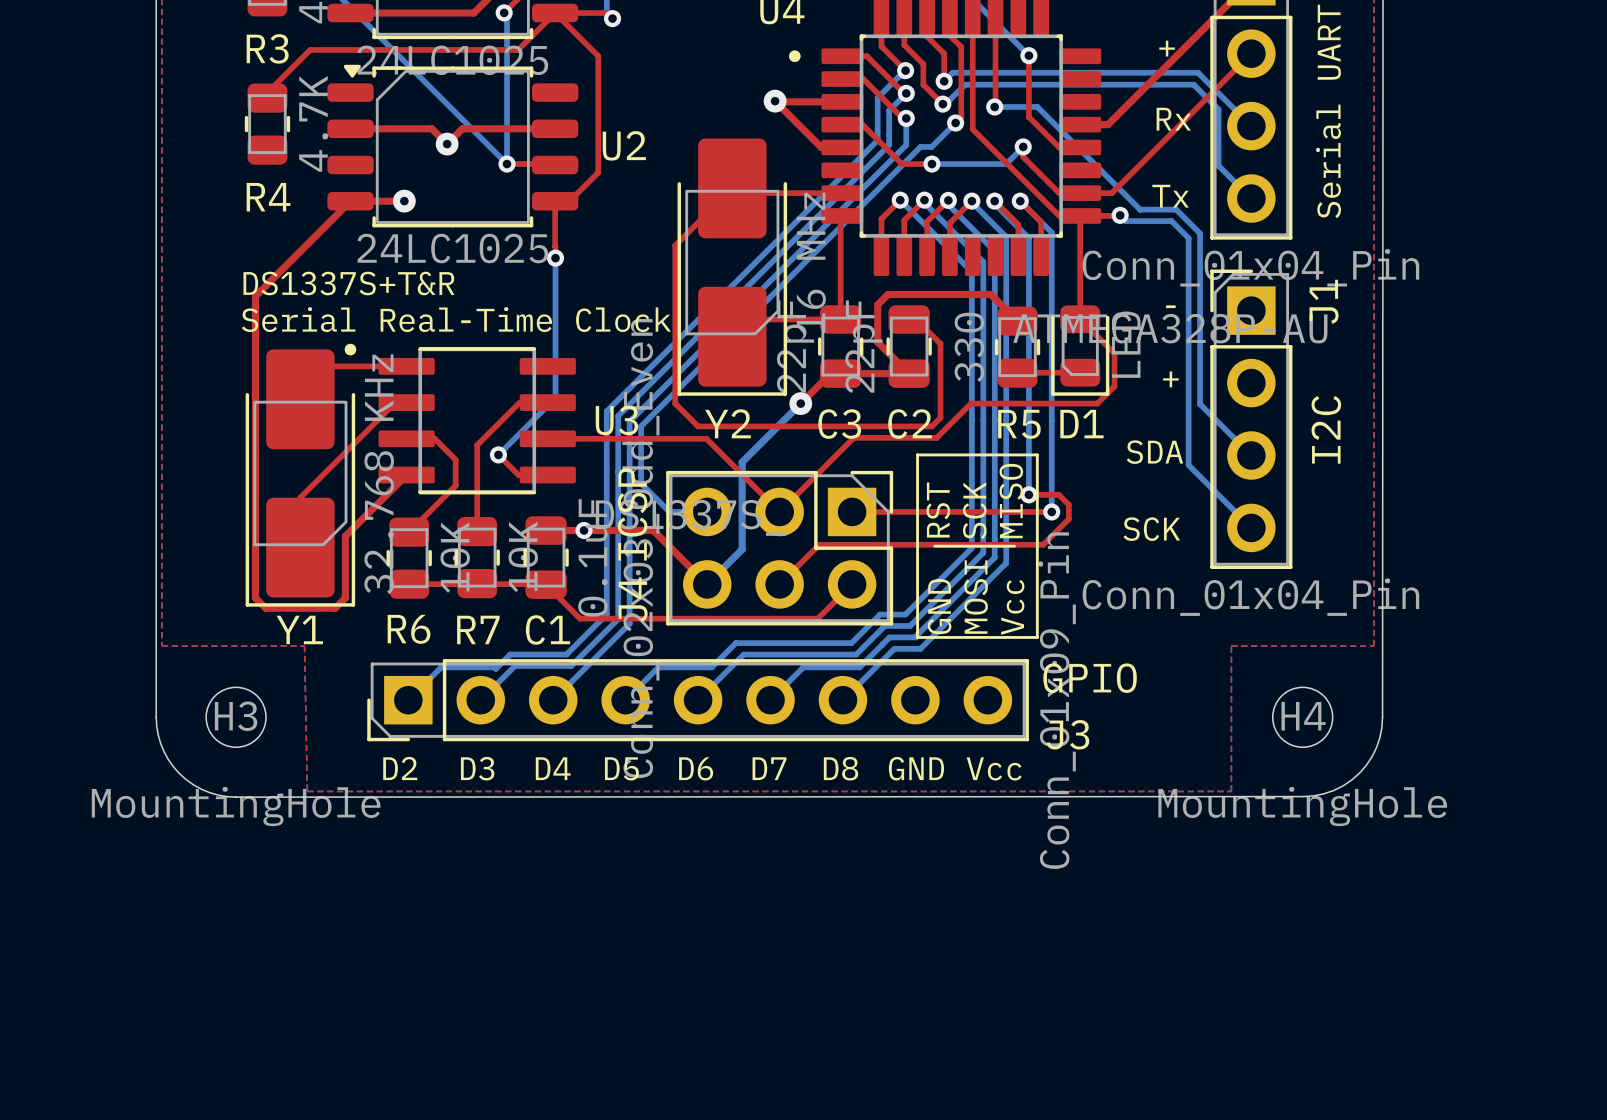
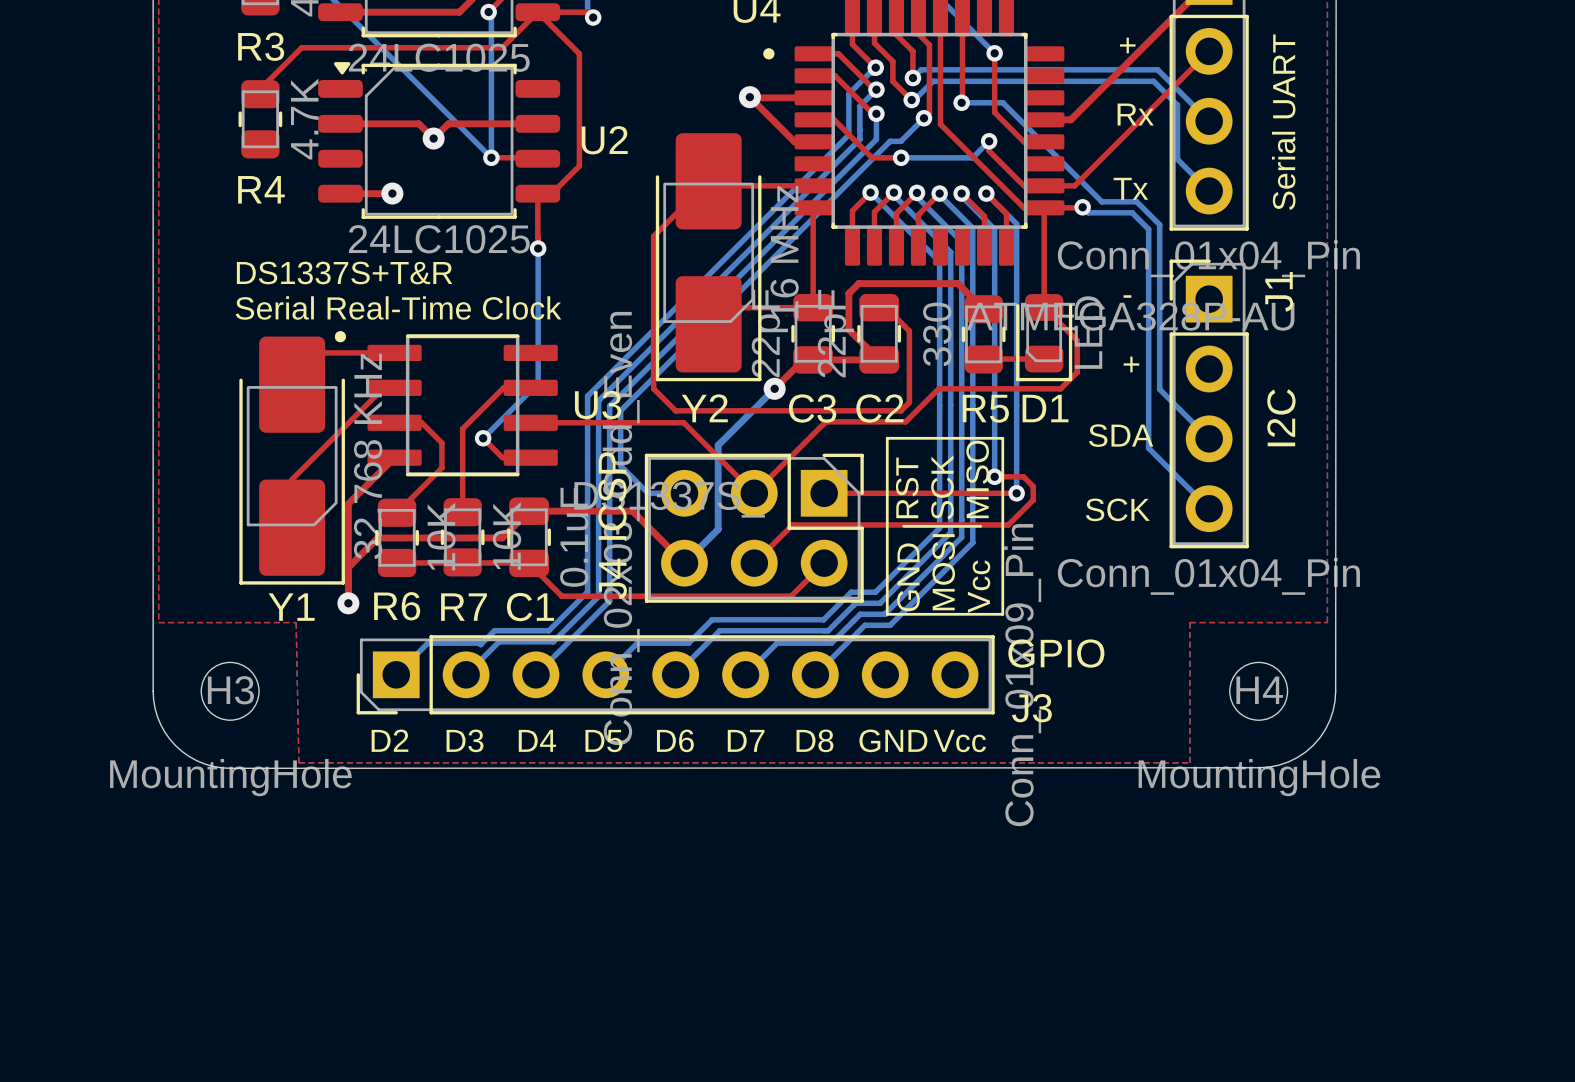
top track: (350, 201) (255, 296) (255, 597) (265, 608) (335, 608) (345, 597) (345, 536) (358, 522) -> (348, 603) (348, 503)
top track: none -> (529, 511) (502, 537) (377, 537) (348, 567)
via: (584, 530) -> none
via: none -> (348, 603)

